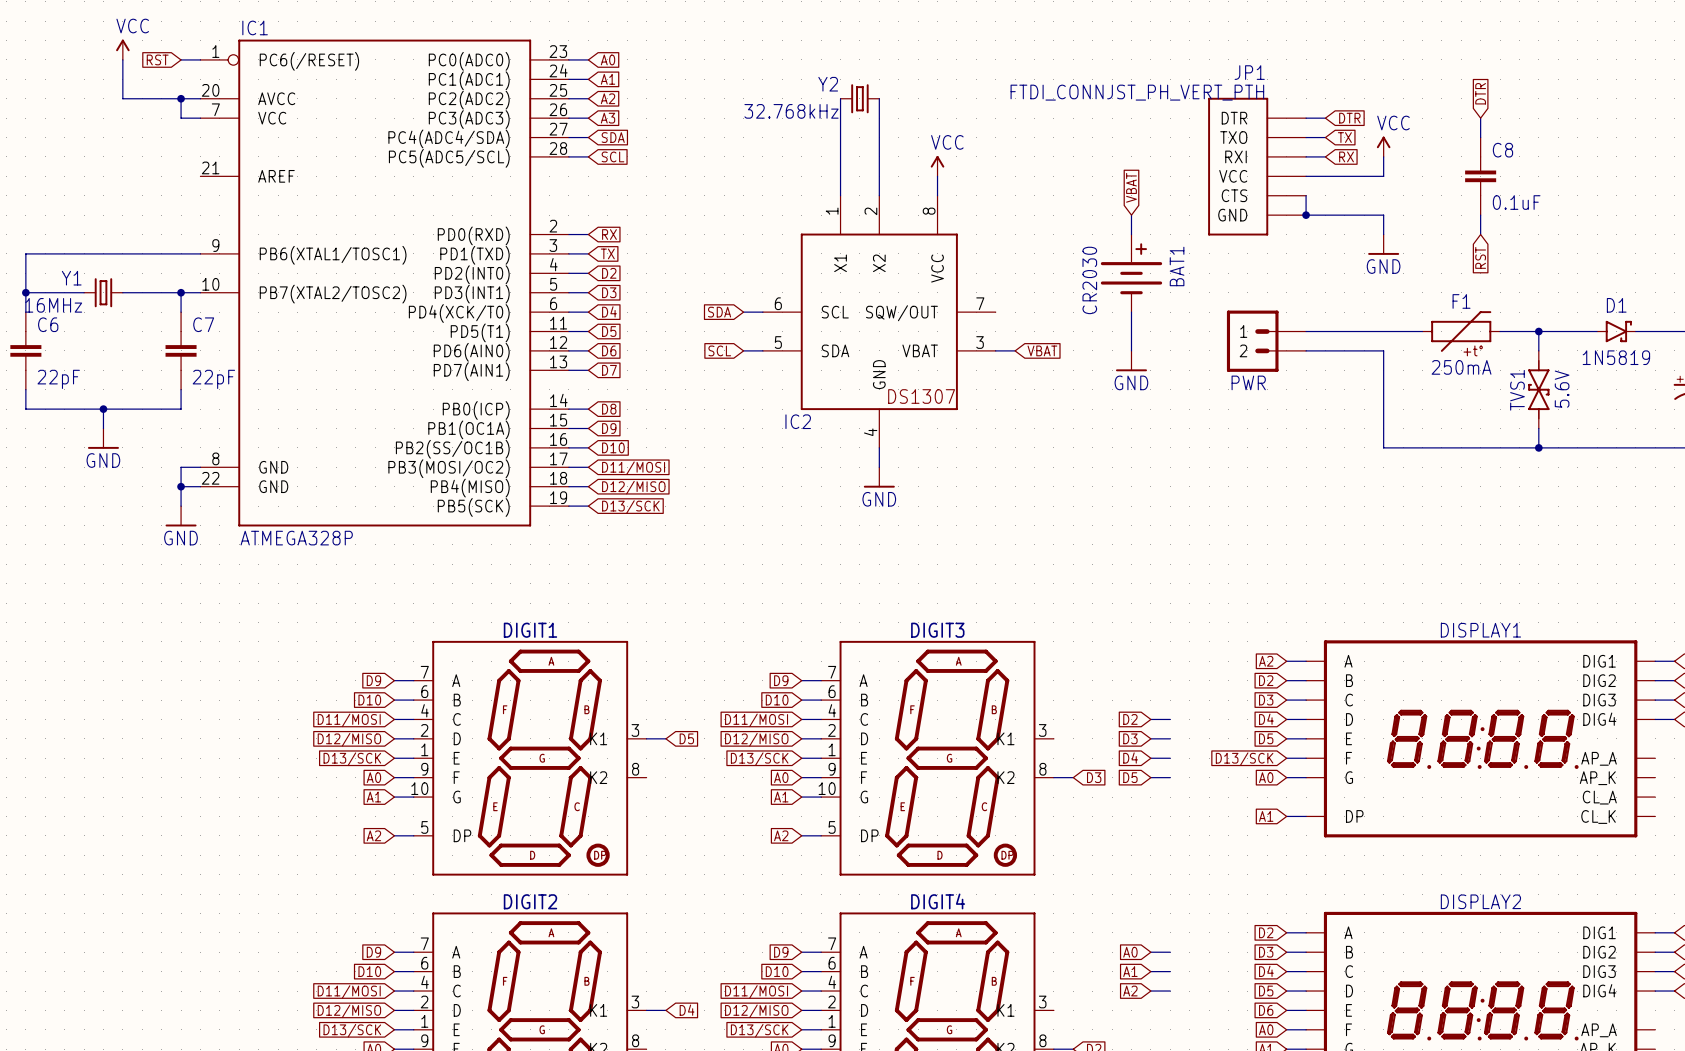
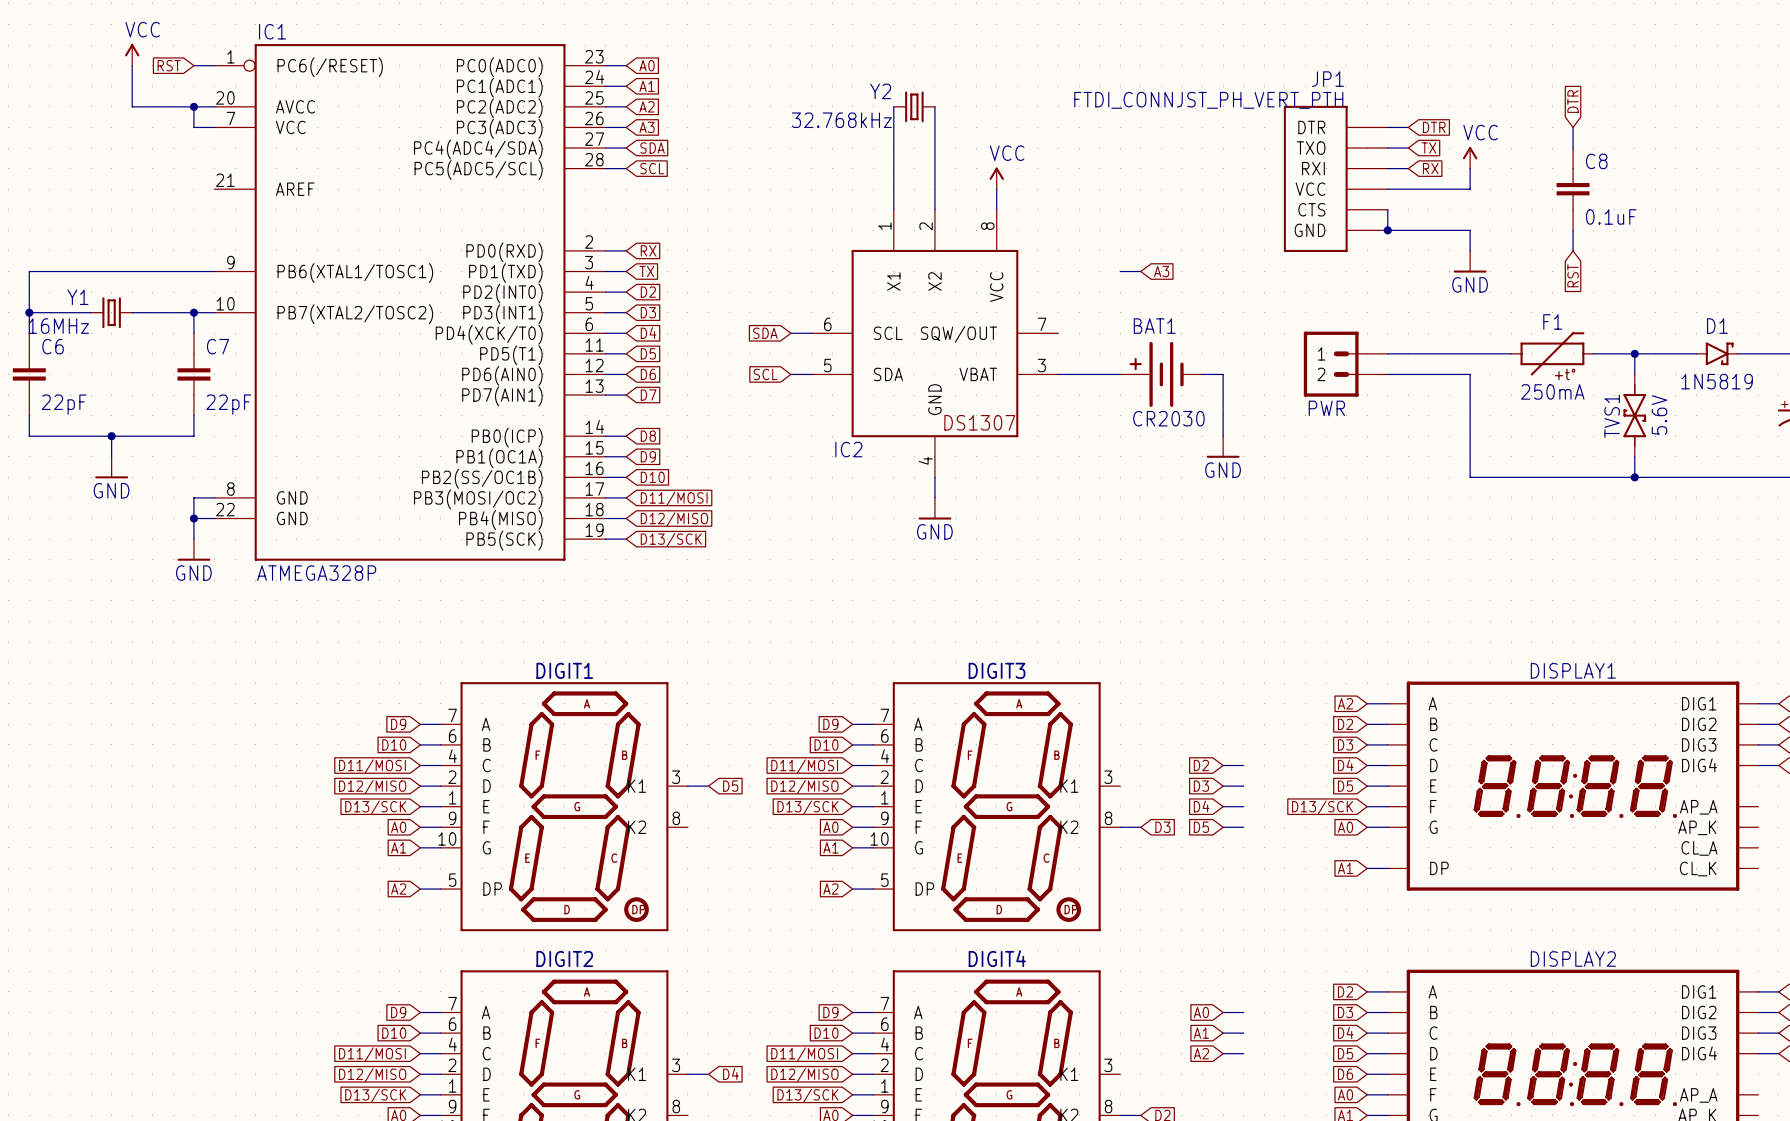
global label: VBAT (1131, 187) -> none
wire: (1131, 215) (1131, 234) -> none
wire: none -> (1120, 271) (1140, 271)
global label: none -> A3 (1161, 271)
BAT1 rotation: 0° (1131, 268) -> 90° counterclockwise (1156, 374)
BAT1 position: (1131, 273) -> (1161, 374)
wire: (1131, 312) (1131, 350) -> (1223, 436) (1223, 374) (1202, 374)
wire: none -> (1079, 374) (1120, 374)
global label: VBAT (1042, 350) -> none
power symbol position: GND (1131, 361) -> GND (1223, 447)

